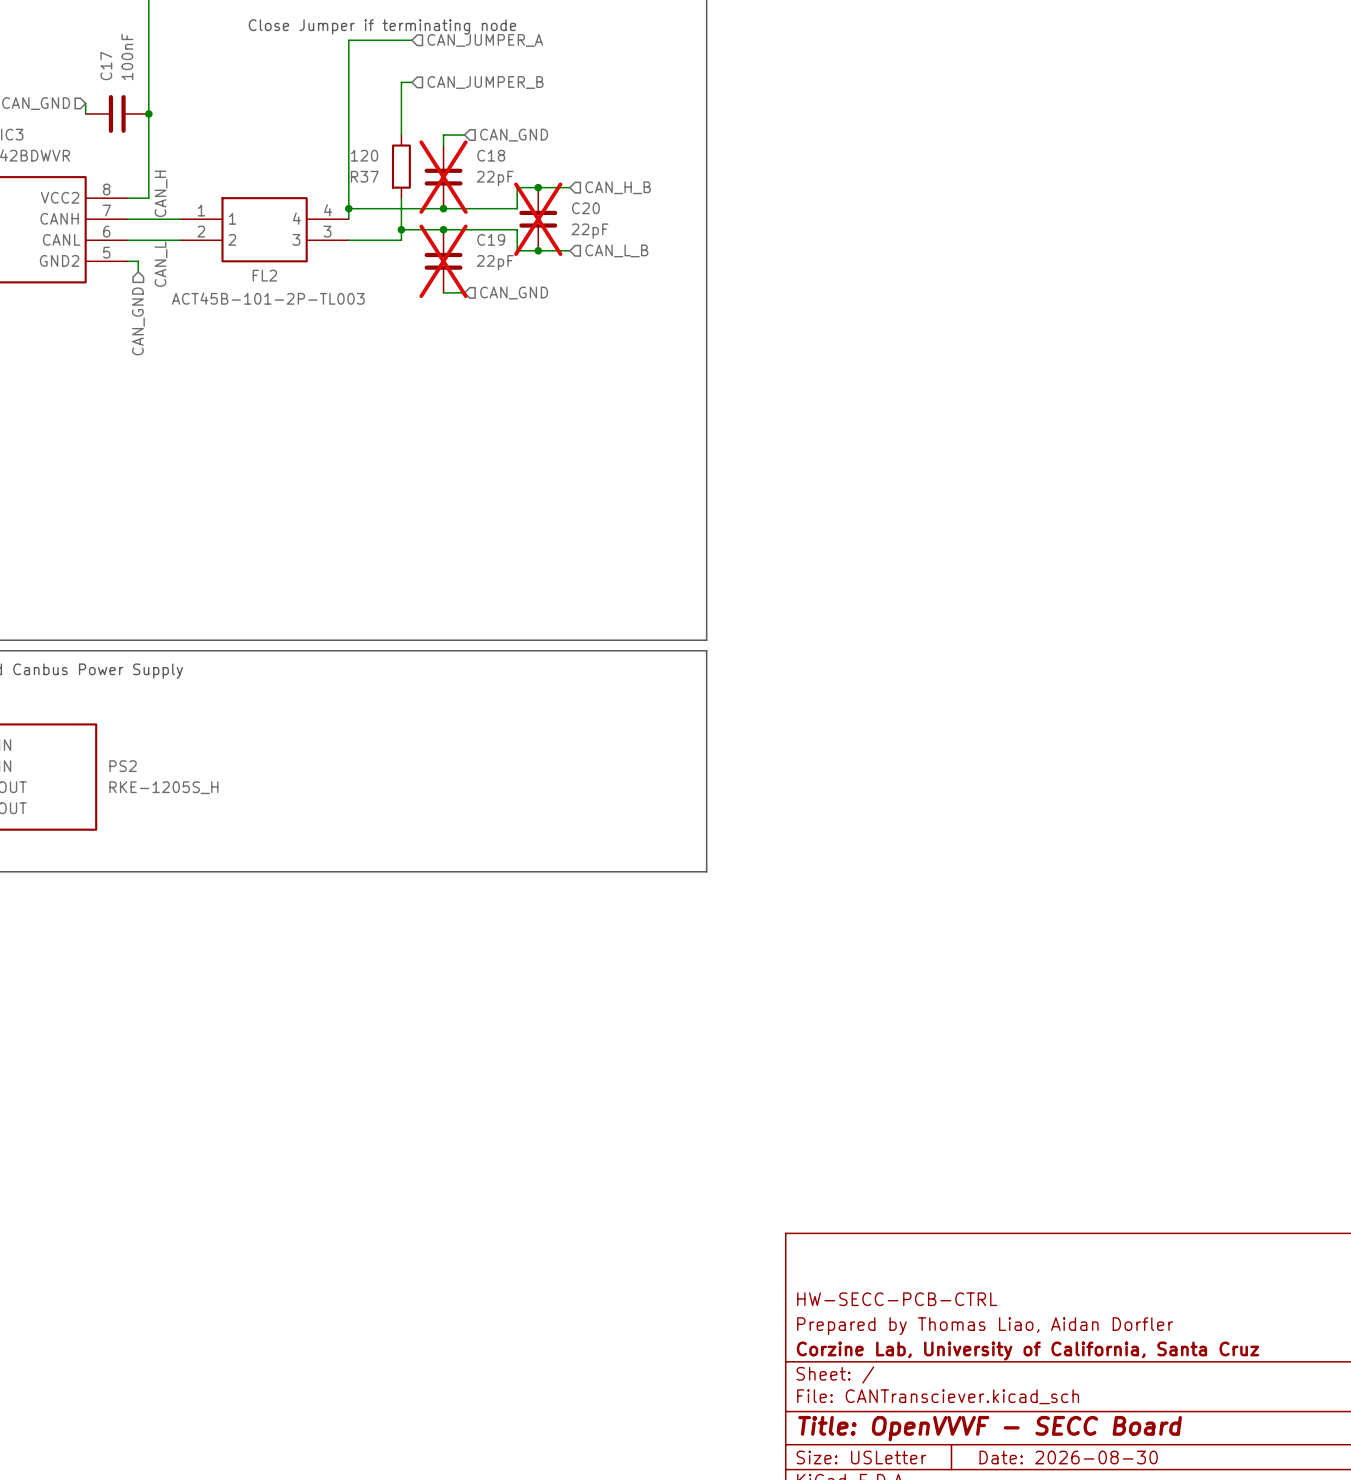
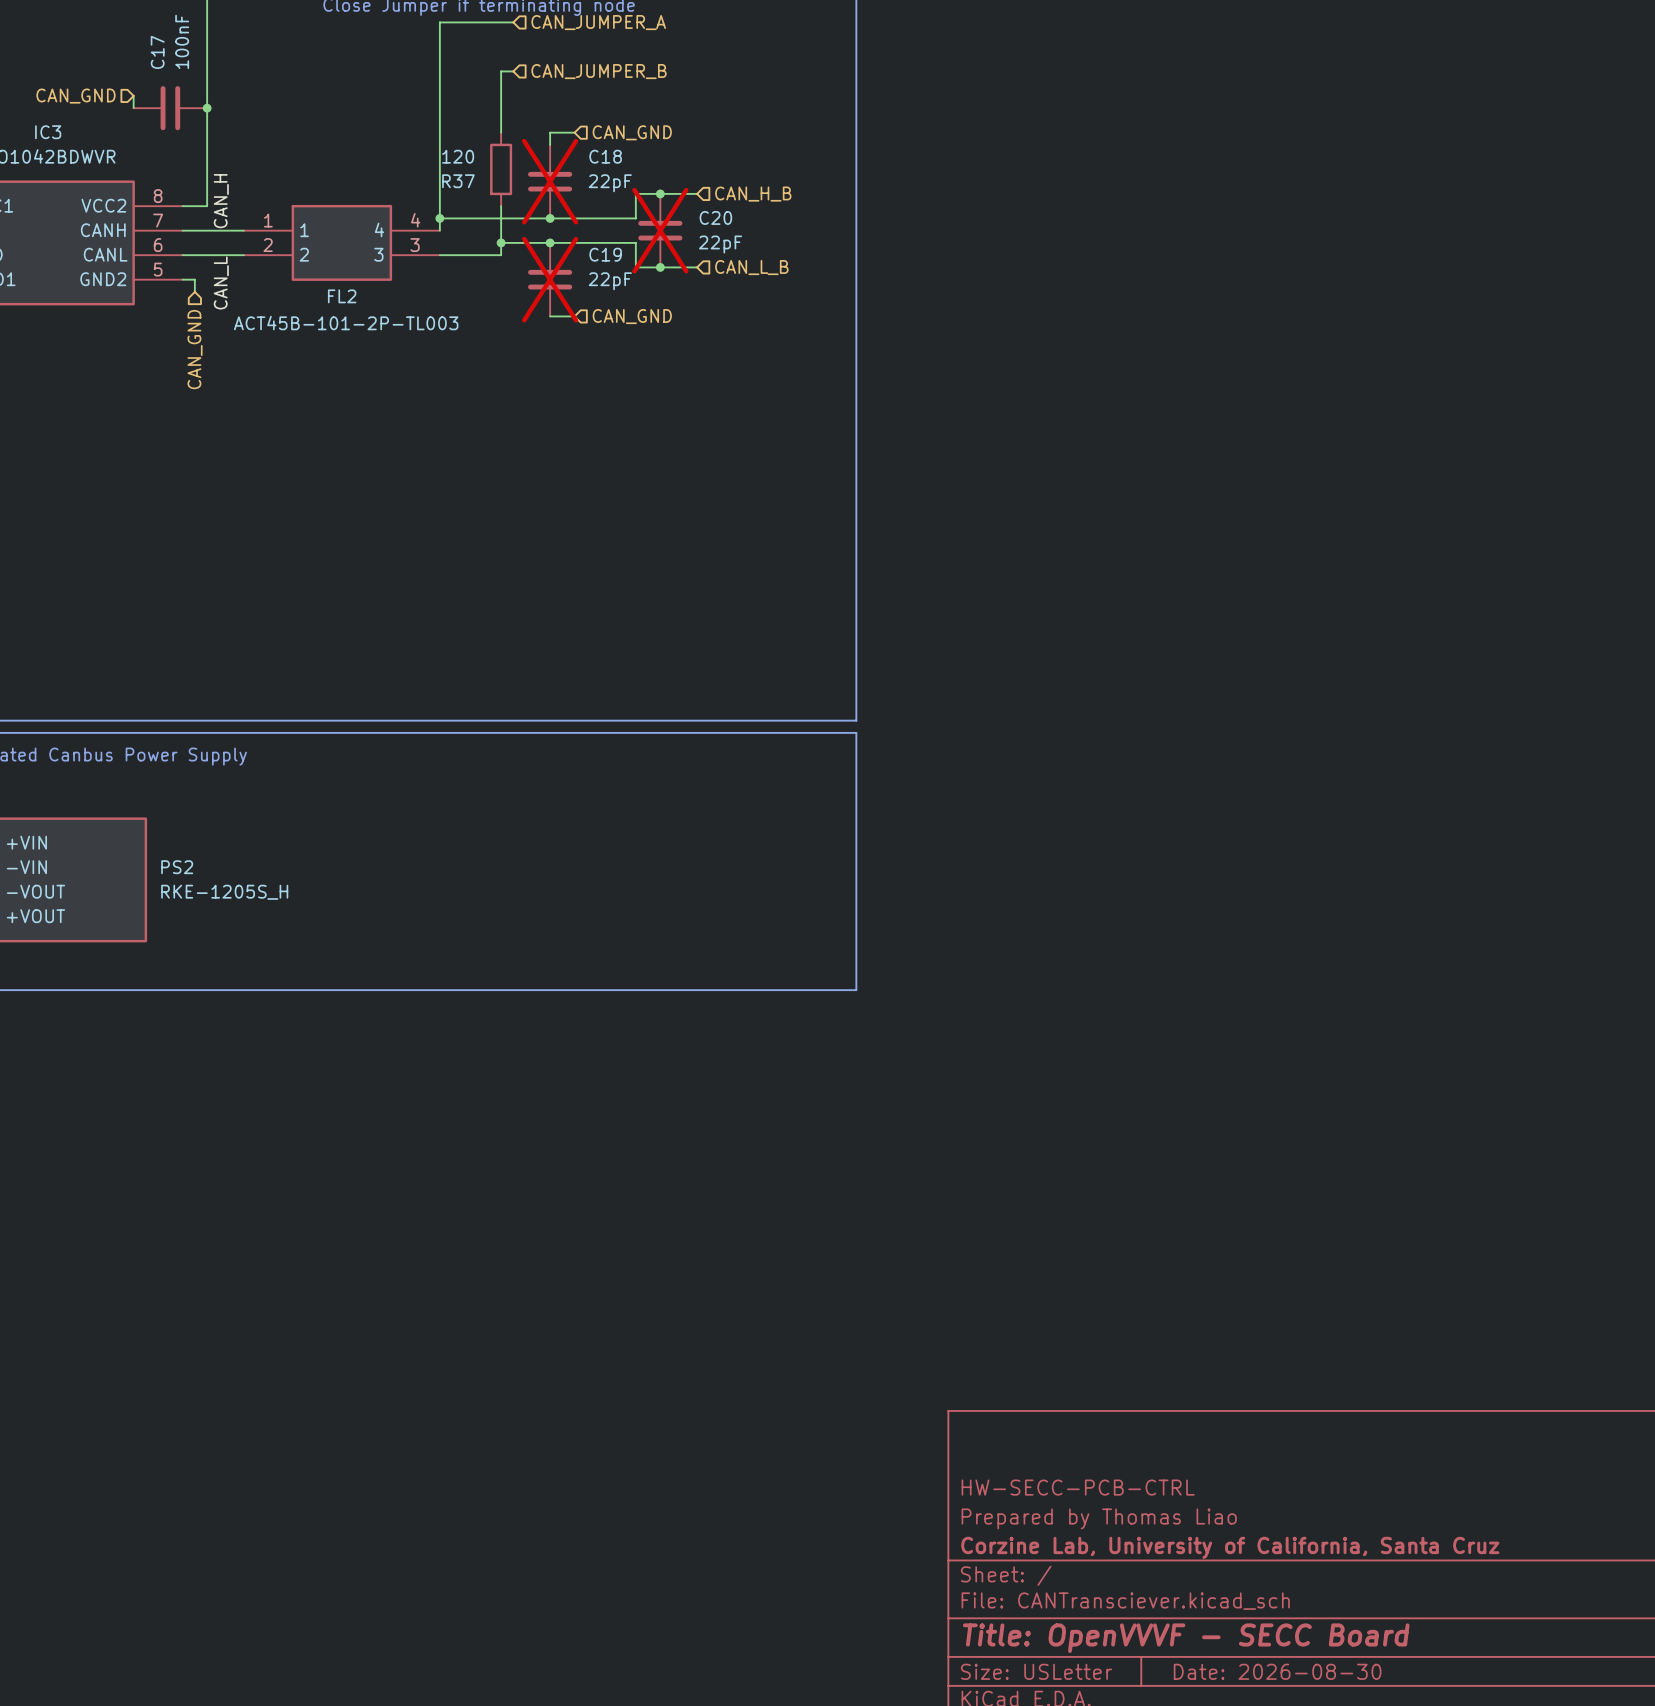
title block: Prepared by Thomas Liao, Aidan Dorfler (985, 1326) -> Prepared by Thomas Liao (1099, 1518)

